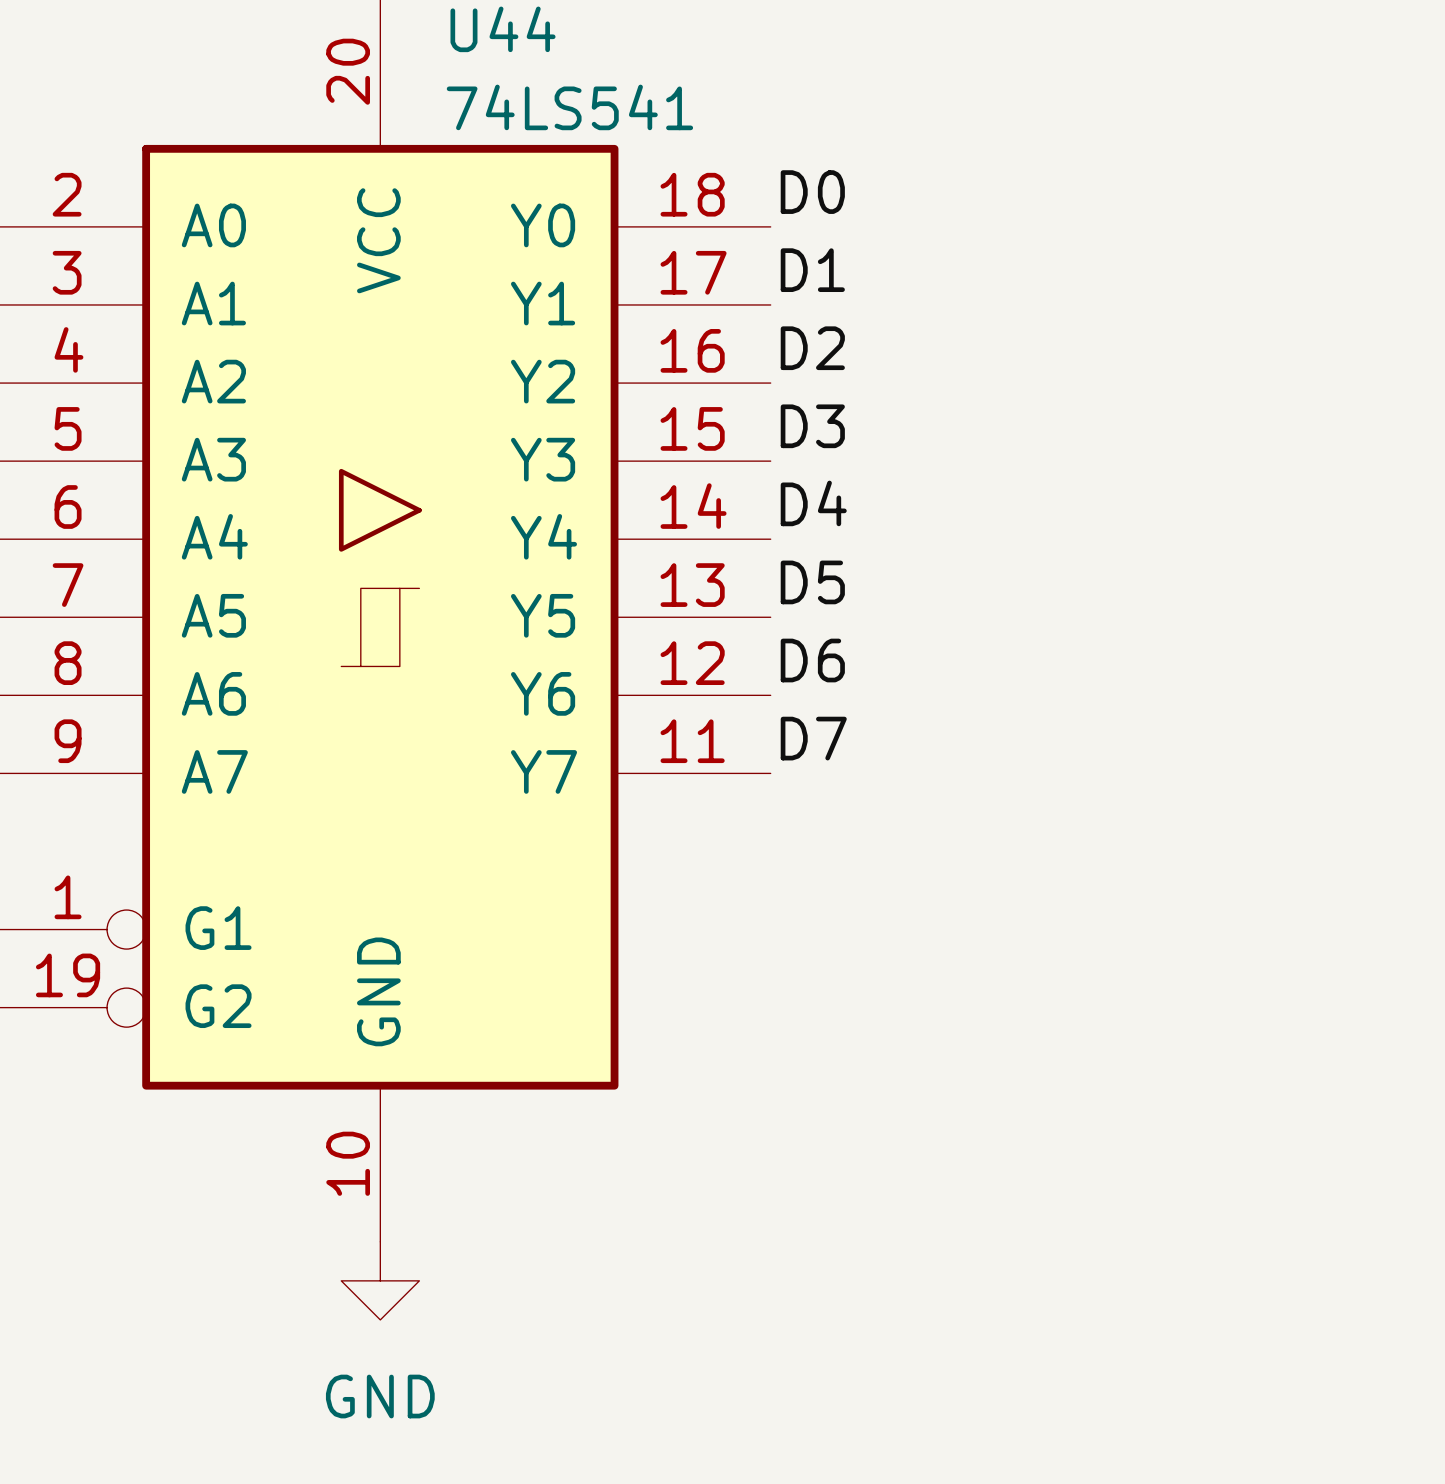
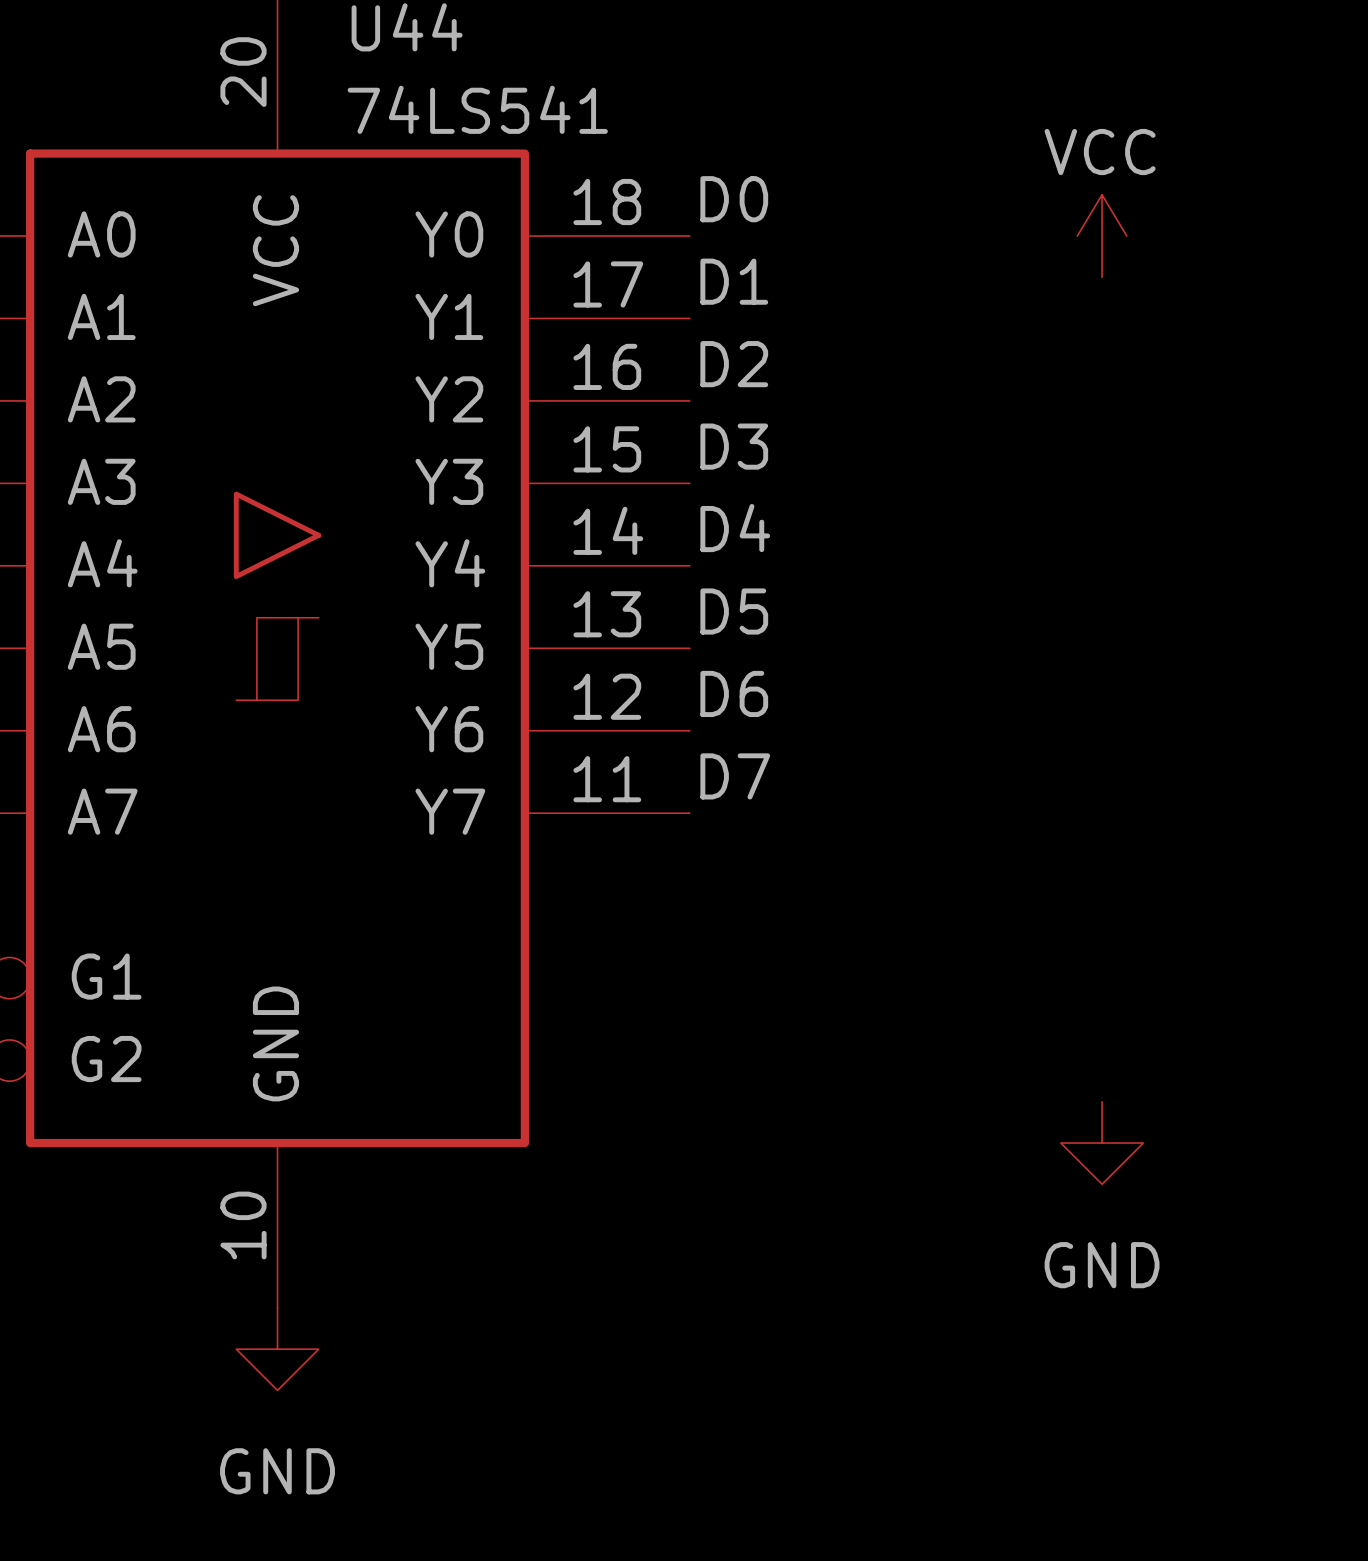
power symbol: none -> VCC (1102, 236)
power symbol: none -> GND (1102, 1143)

